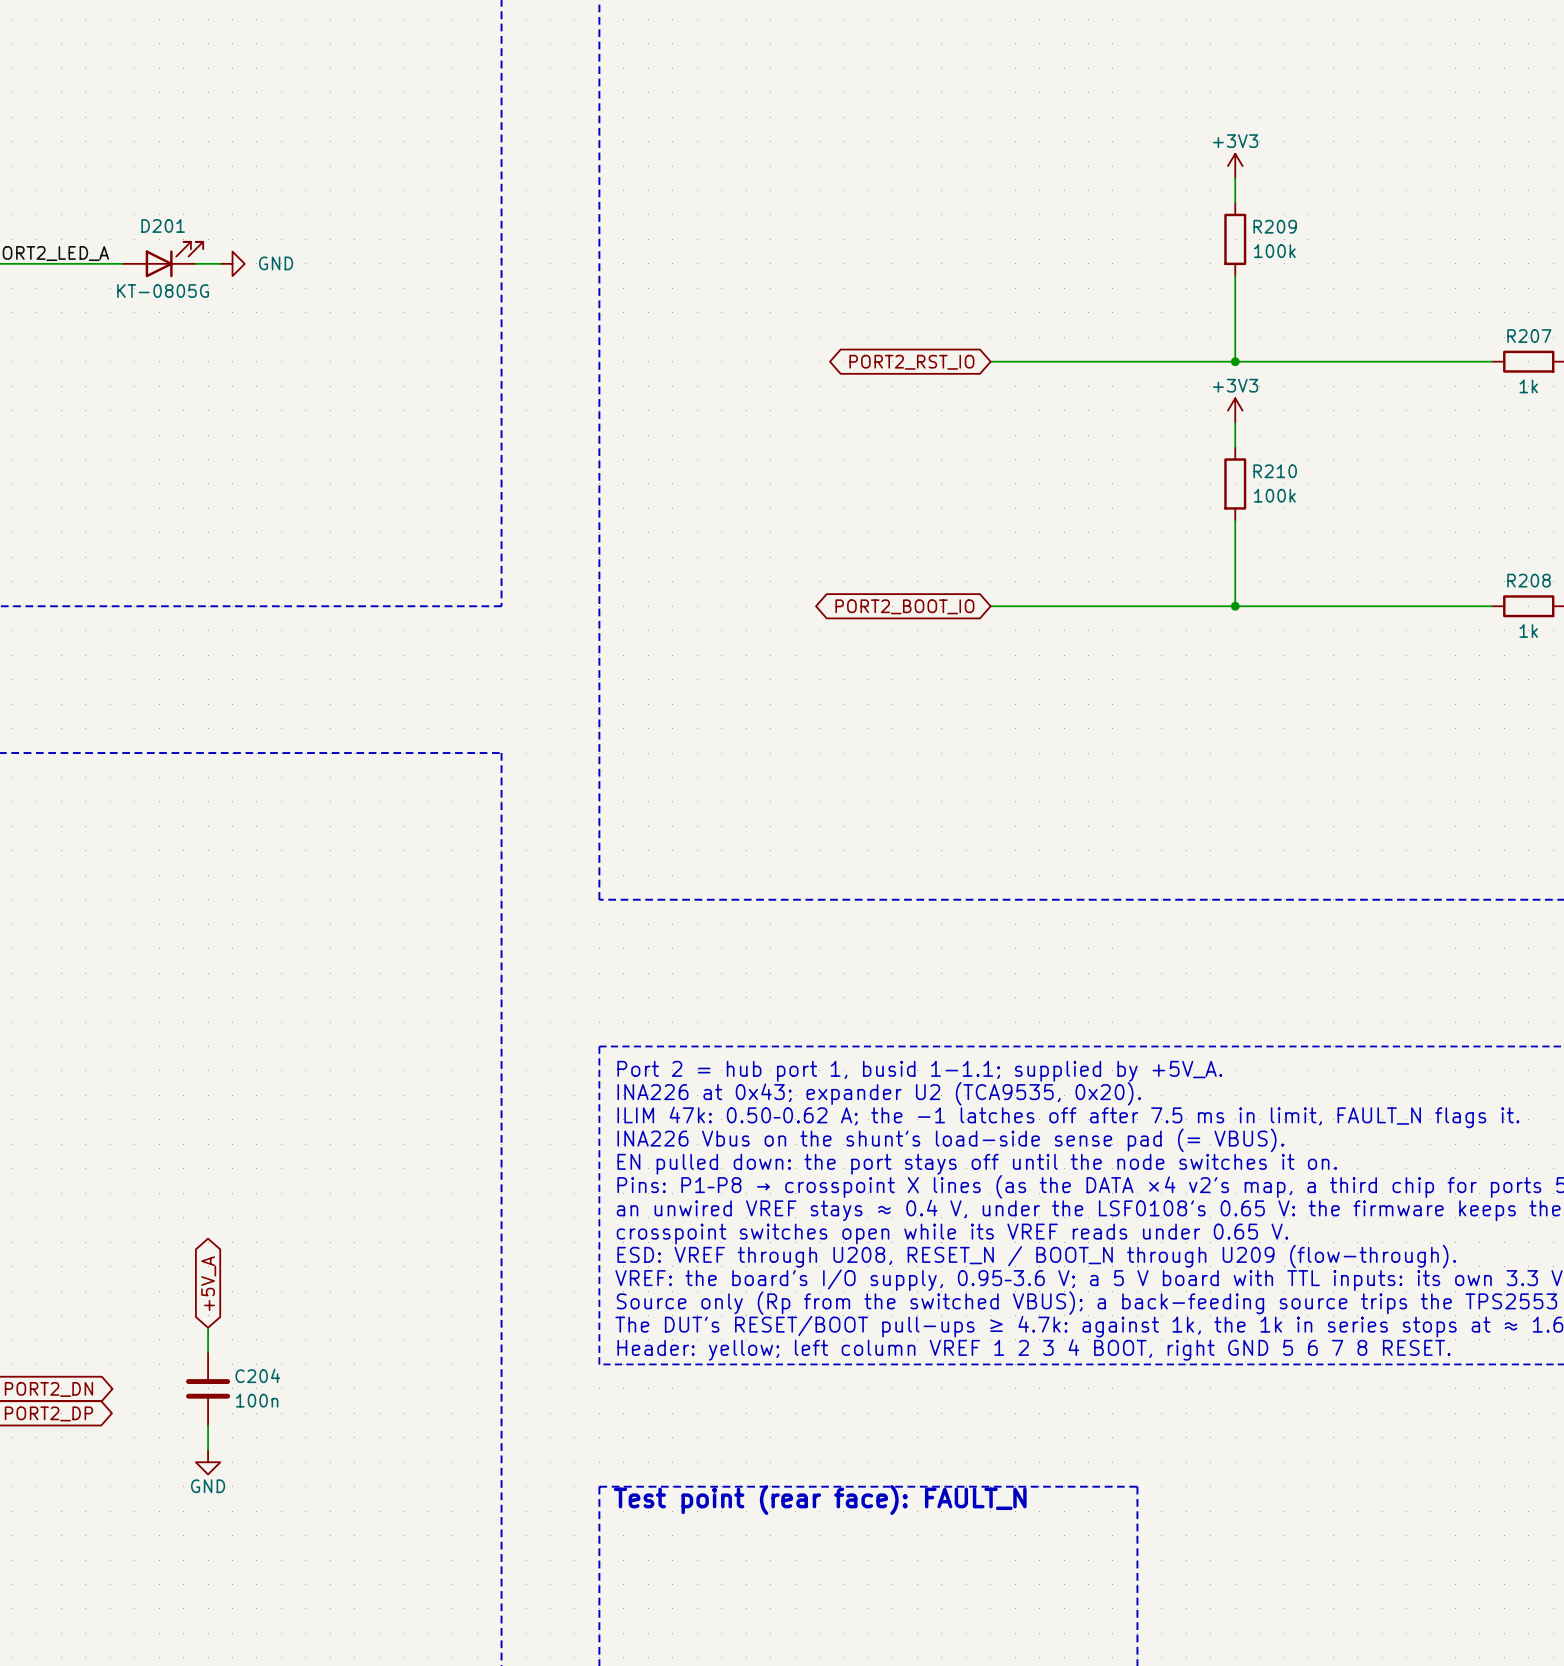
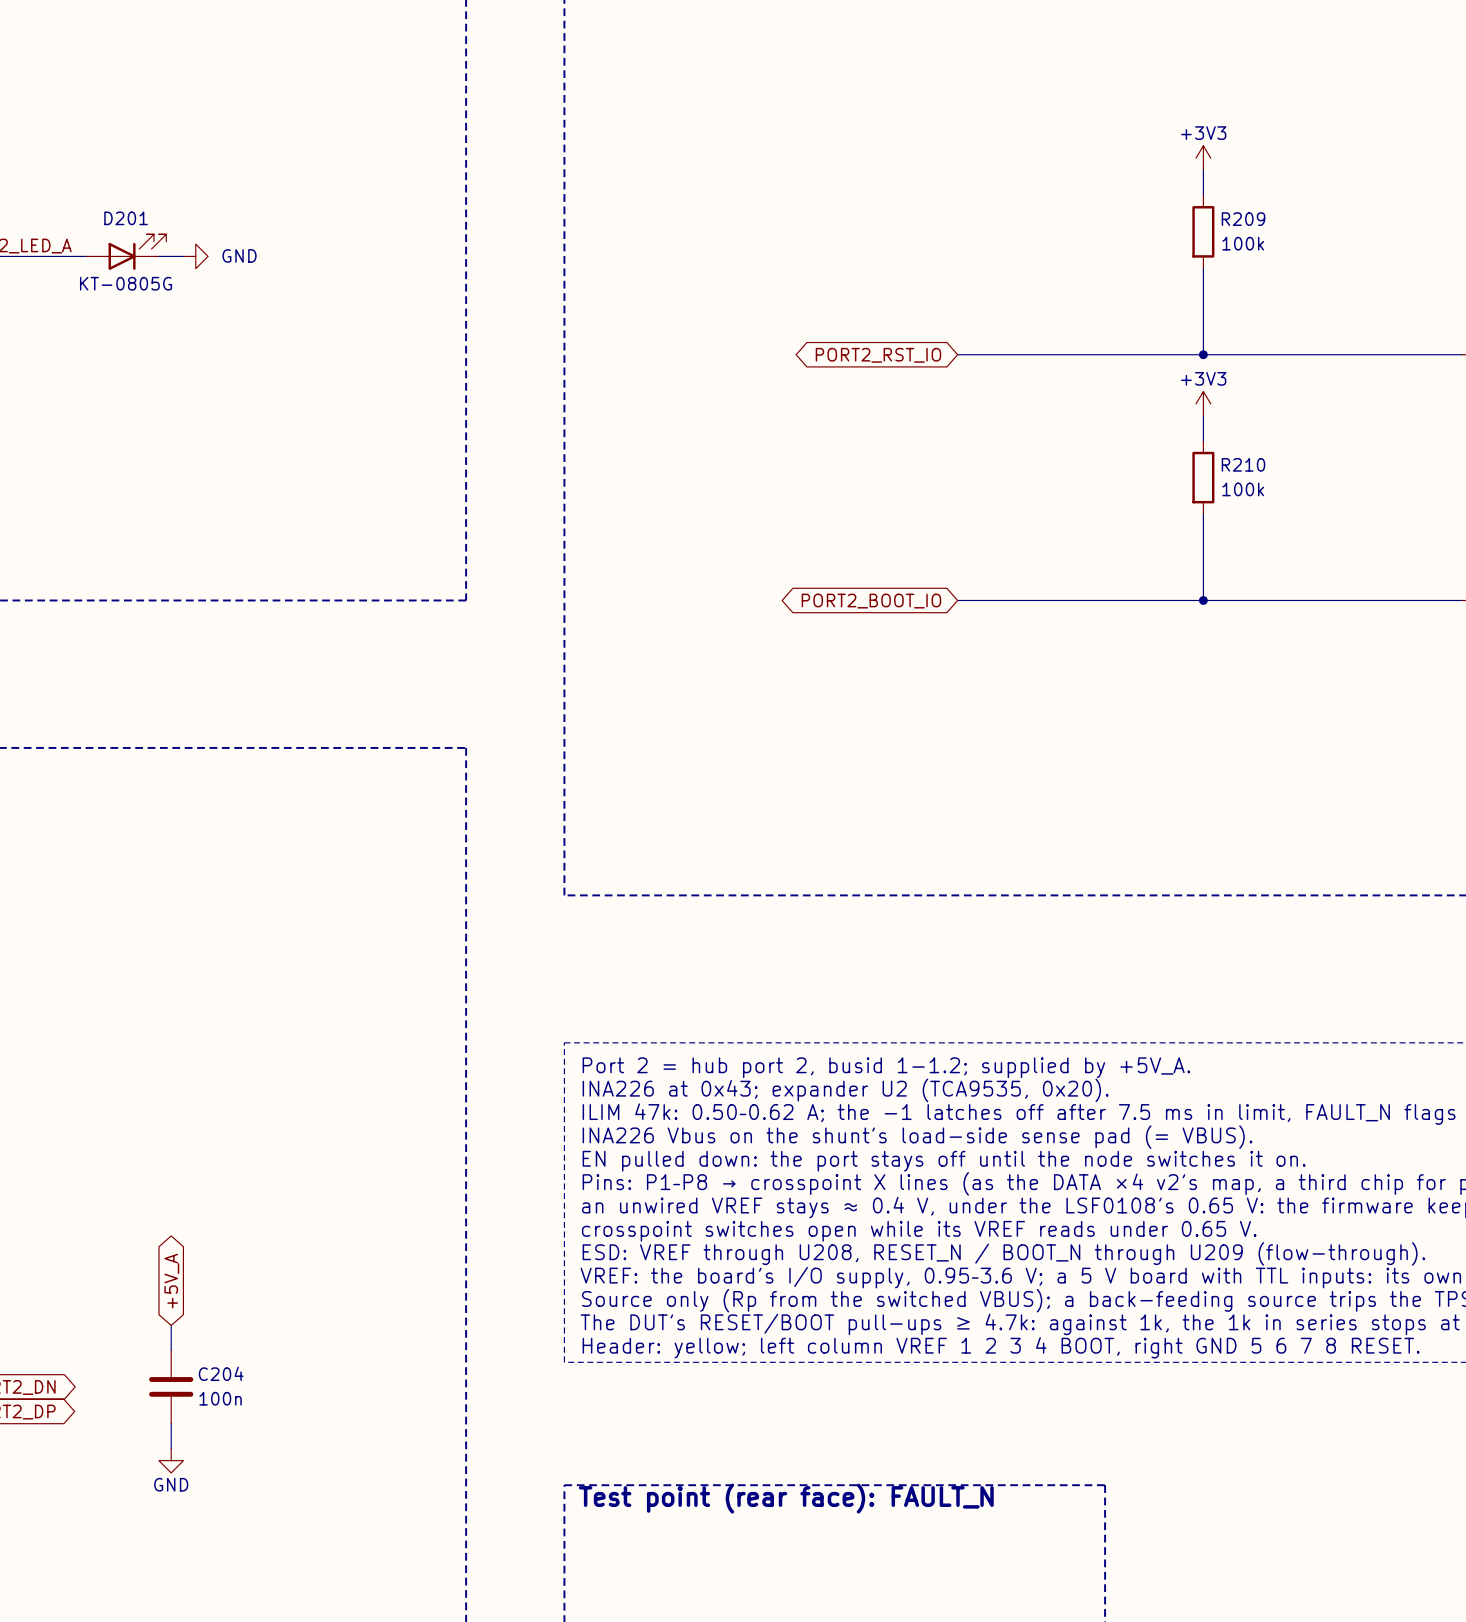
text: Port 2 = hub port 1, busid 1-1.1; supplied by +5V_A. (919, 1071) -> Port 2 = hub port 2, busid 1-1.2; supplied by +5V_A. (886, 1067)

